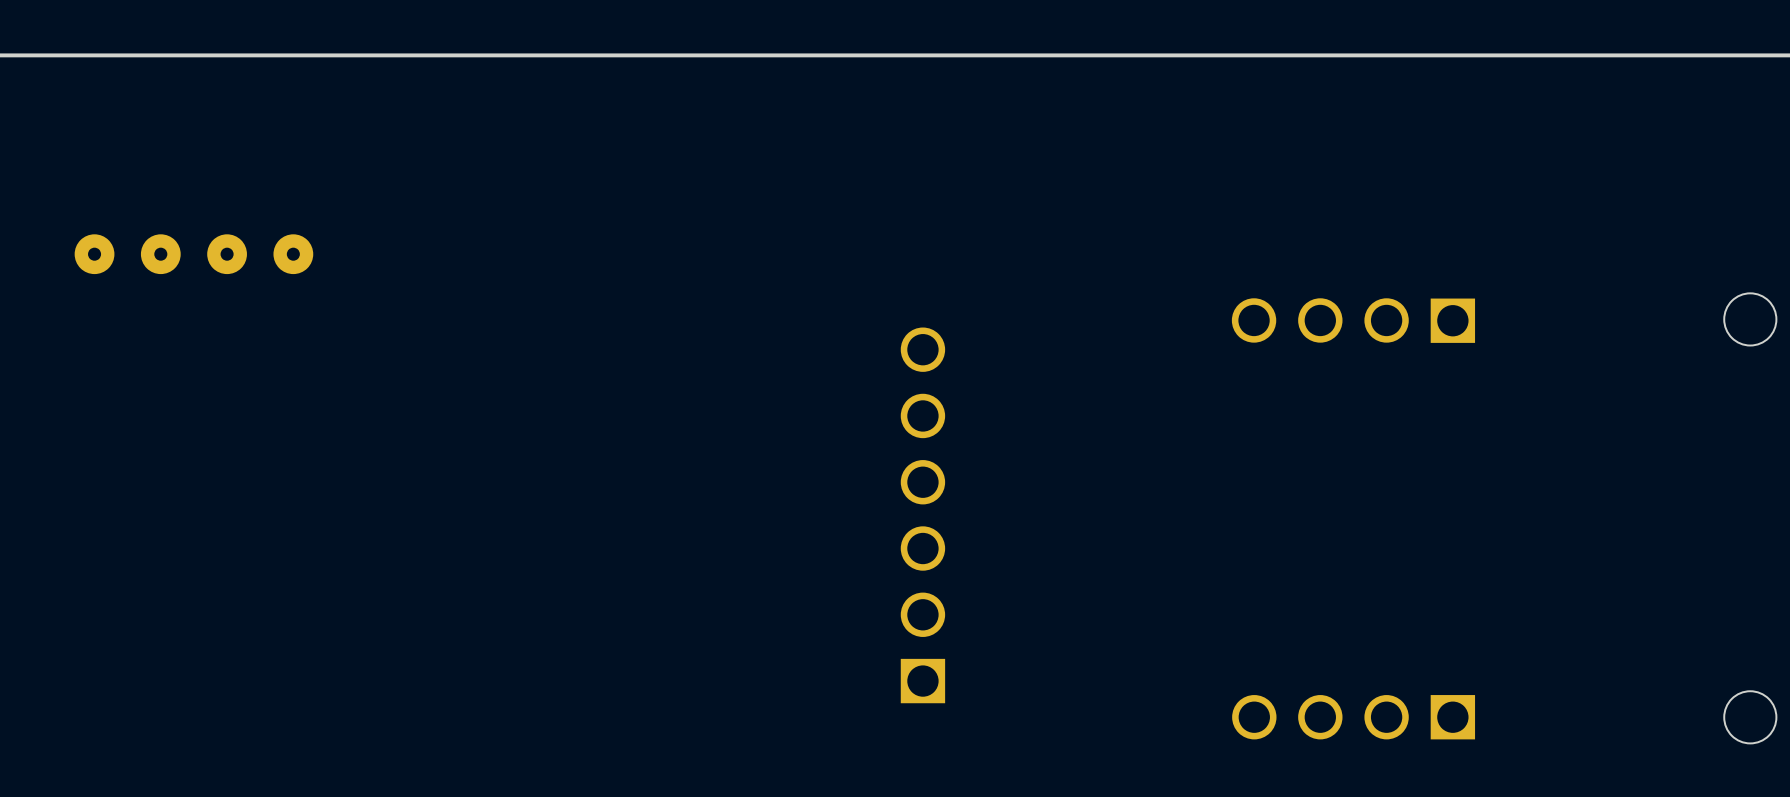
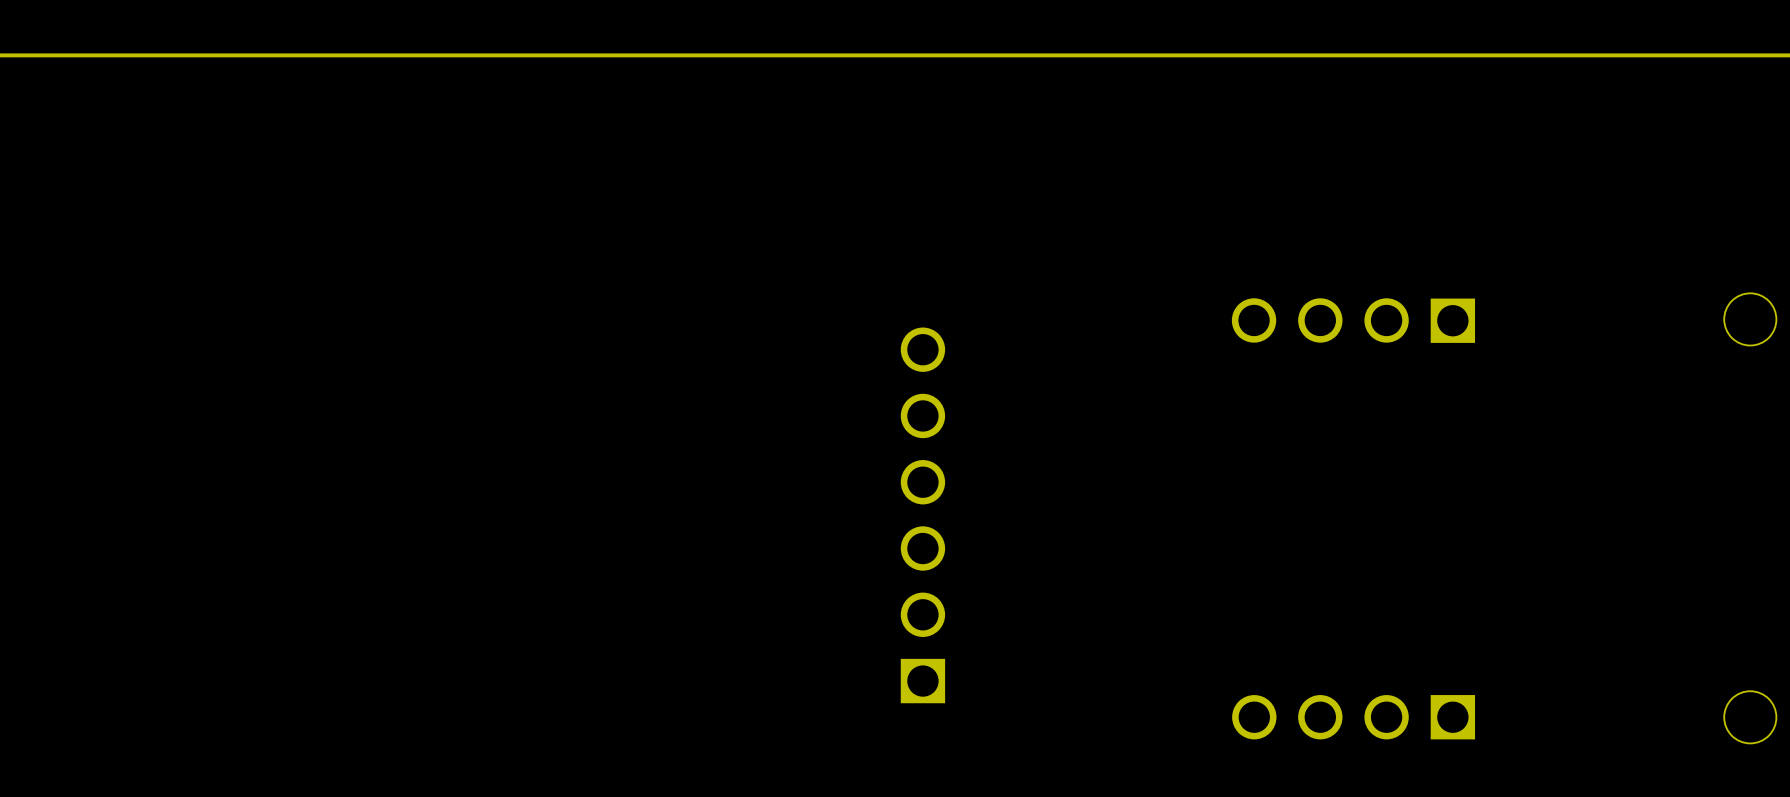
part: (193, 254) -> none

